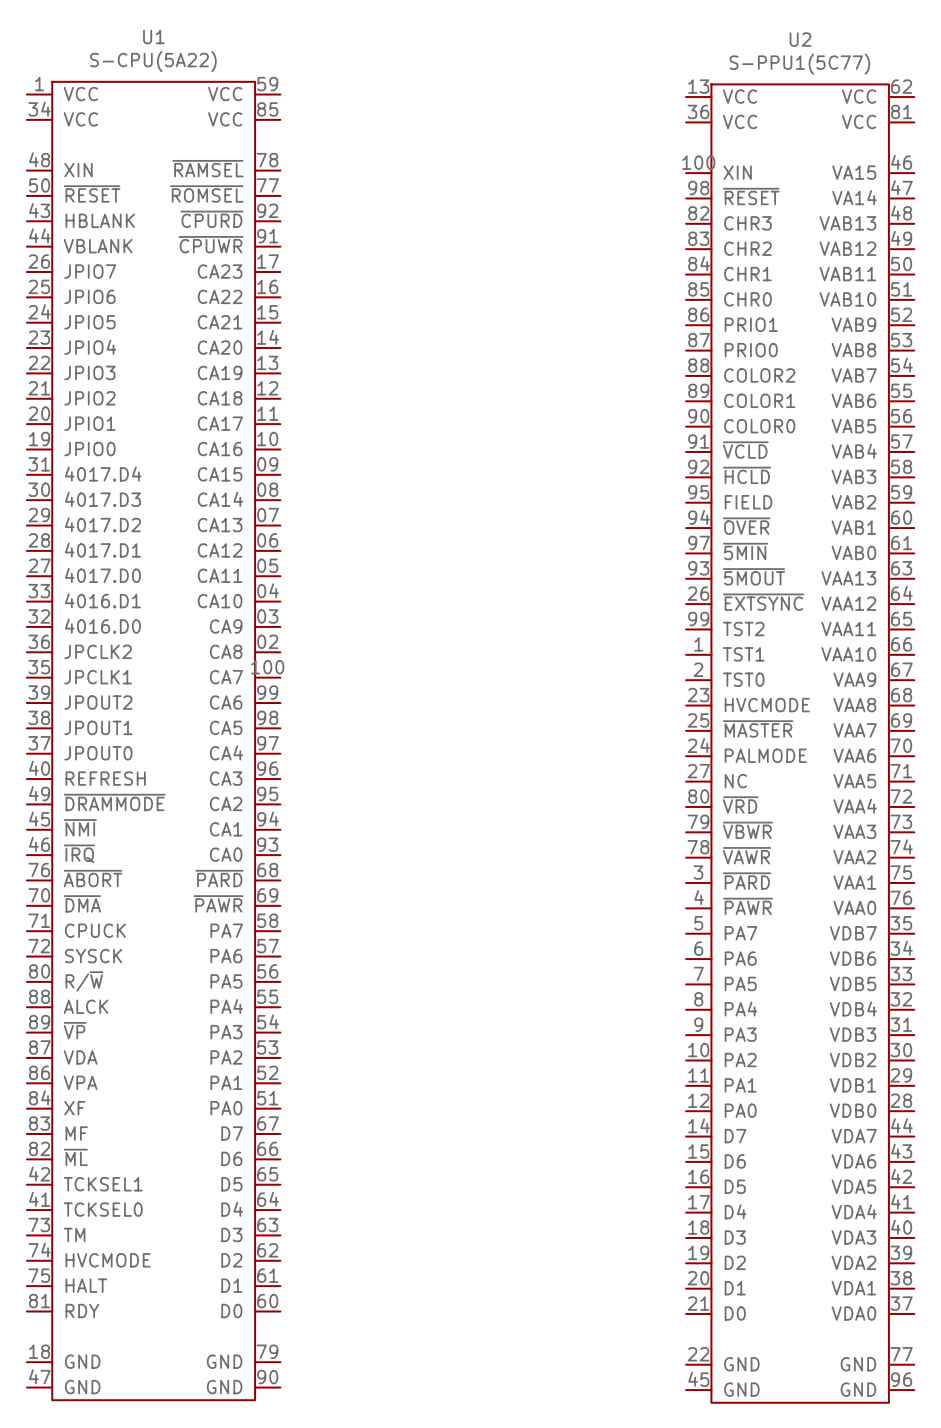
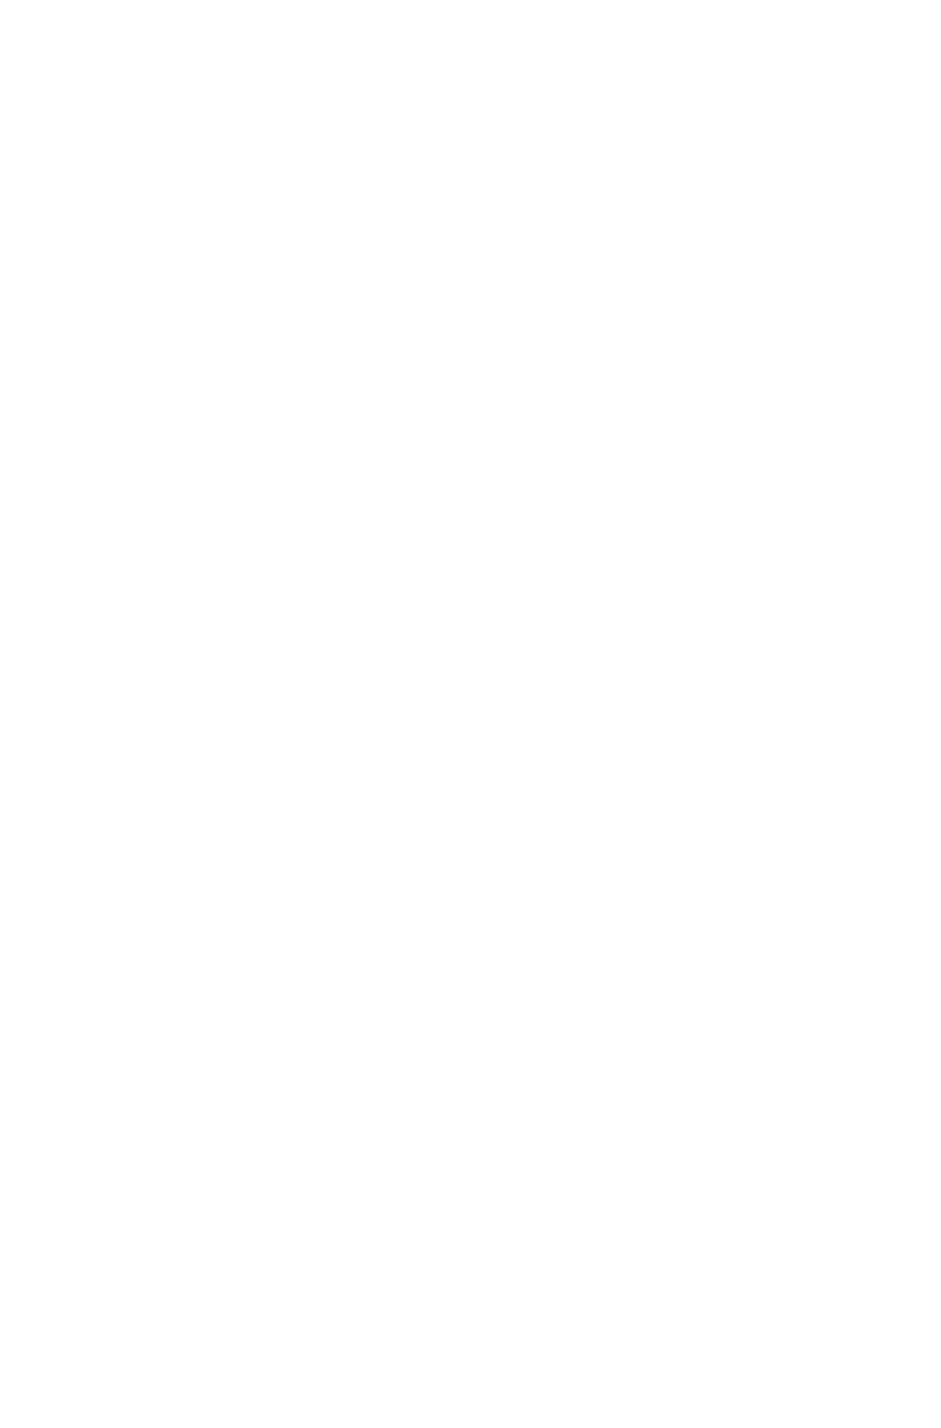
U1: S-CPU(5A22) (153, 741) -> none
U2: S-PPU1(5C77) (800, 743) -> none

